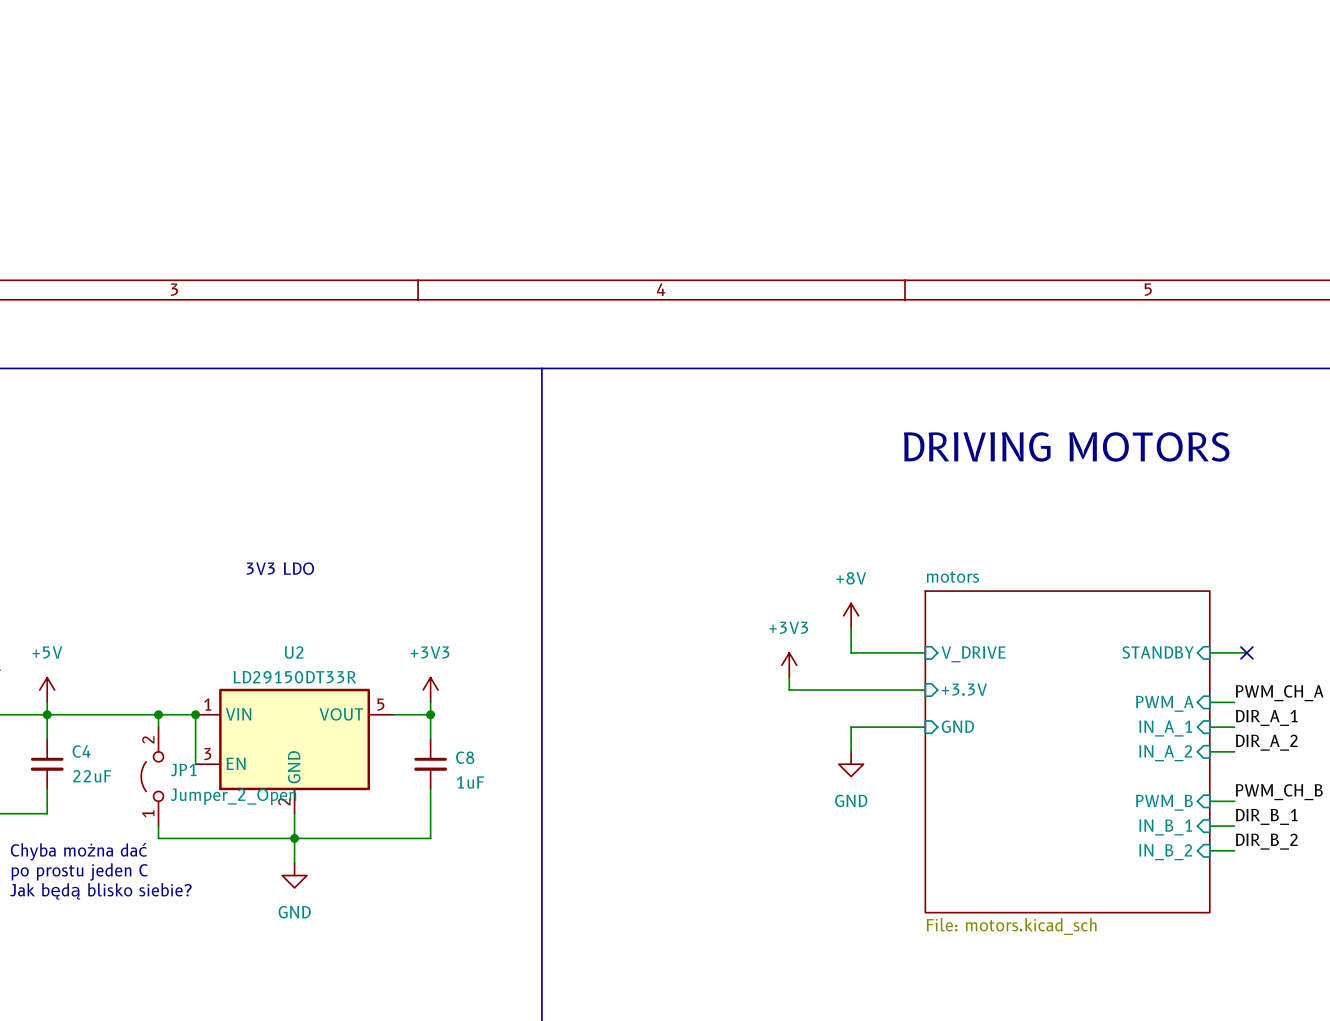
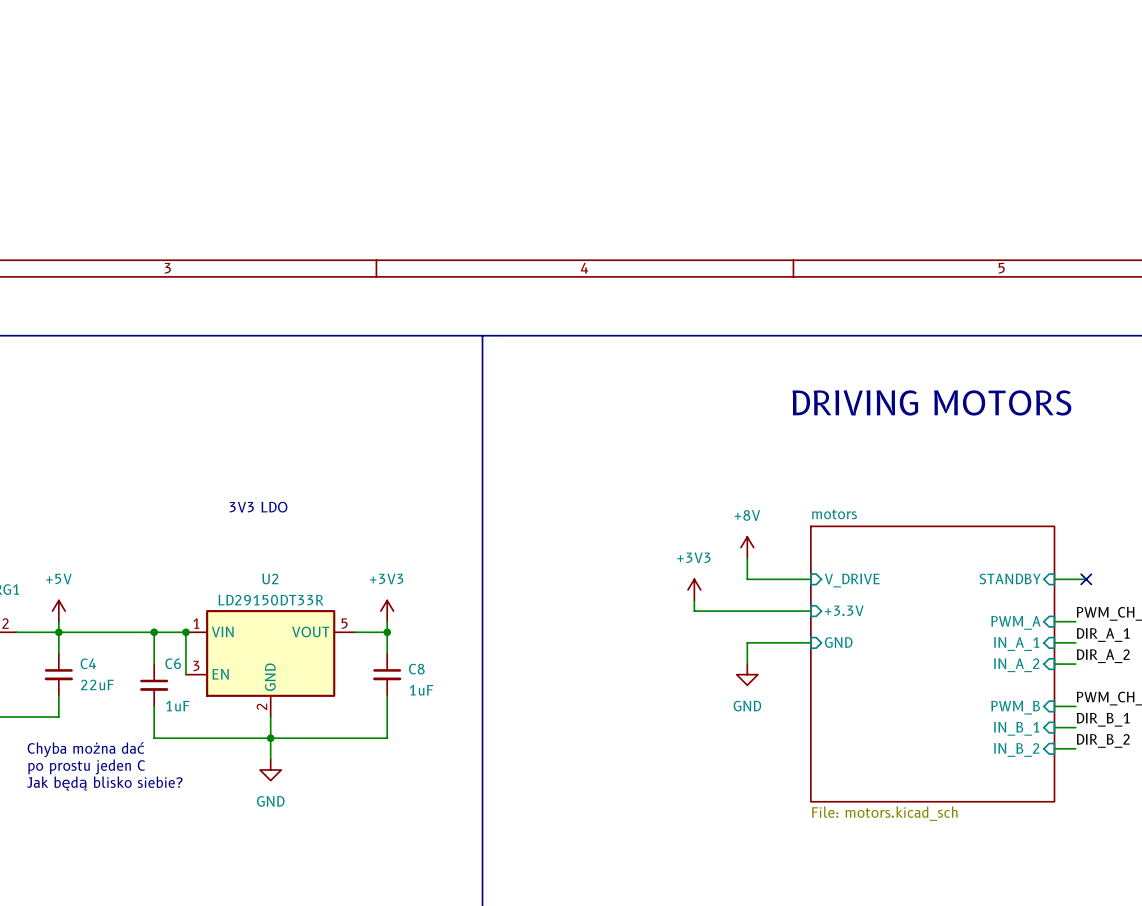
JP1: Jumper_2_Open (152, 776) -> none
C6: none -> 1uF (154, 685)

